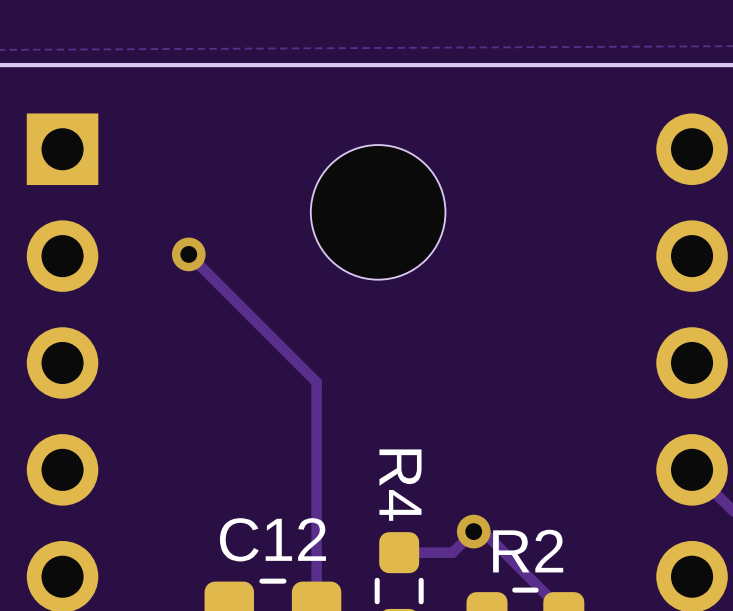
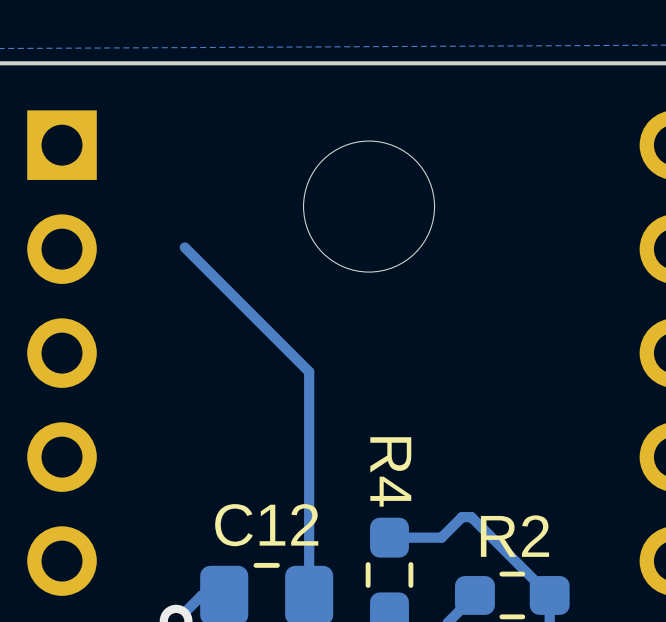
via: (188, 254) -> none
via: (473, 531) -> none

